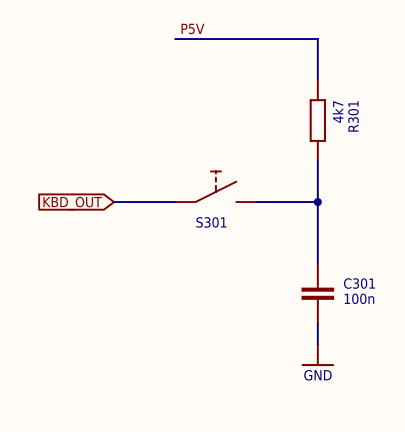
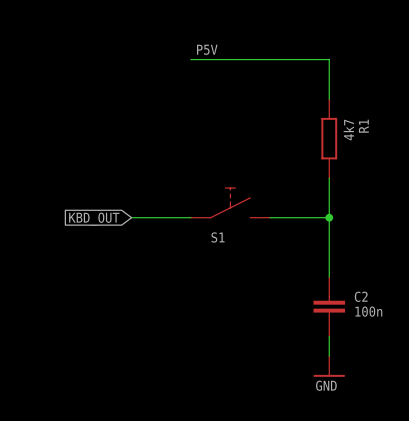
R301 name: R301 (353, 116) -> R1 (363, 126)
S301 name: S301 (211, 222) -> S1 (218, 237)
C301 name: C301 (359, 283) -> C2 (361, 296)

